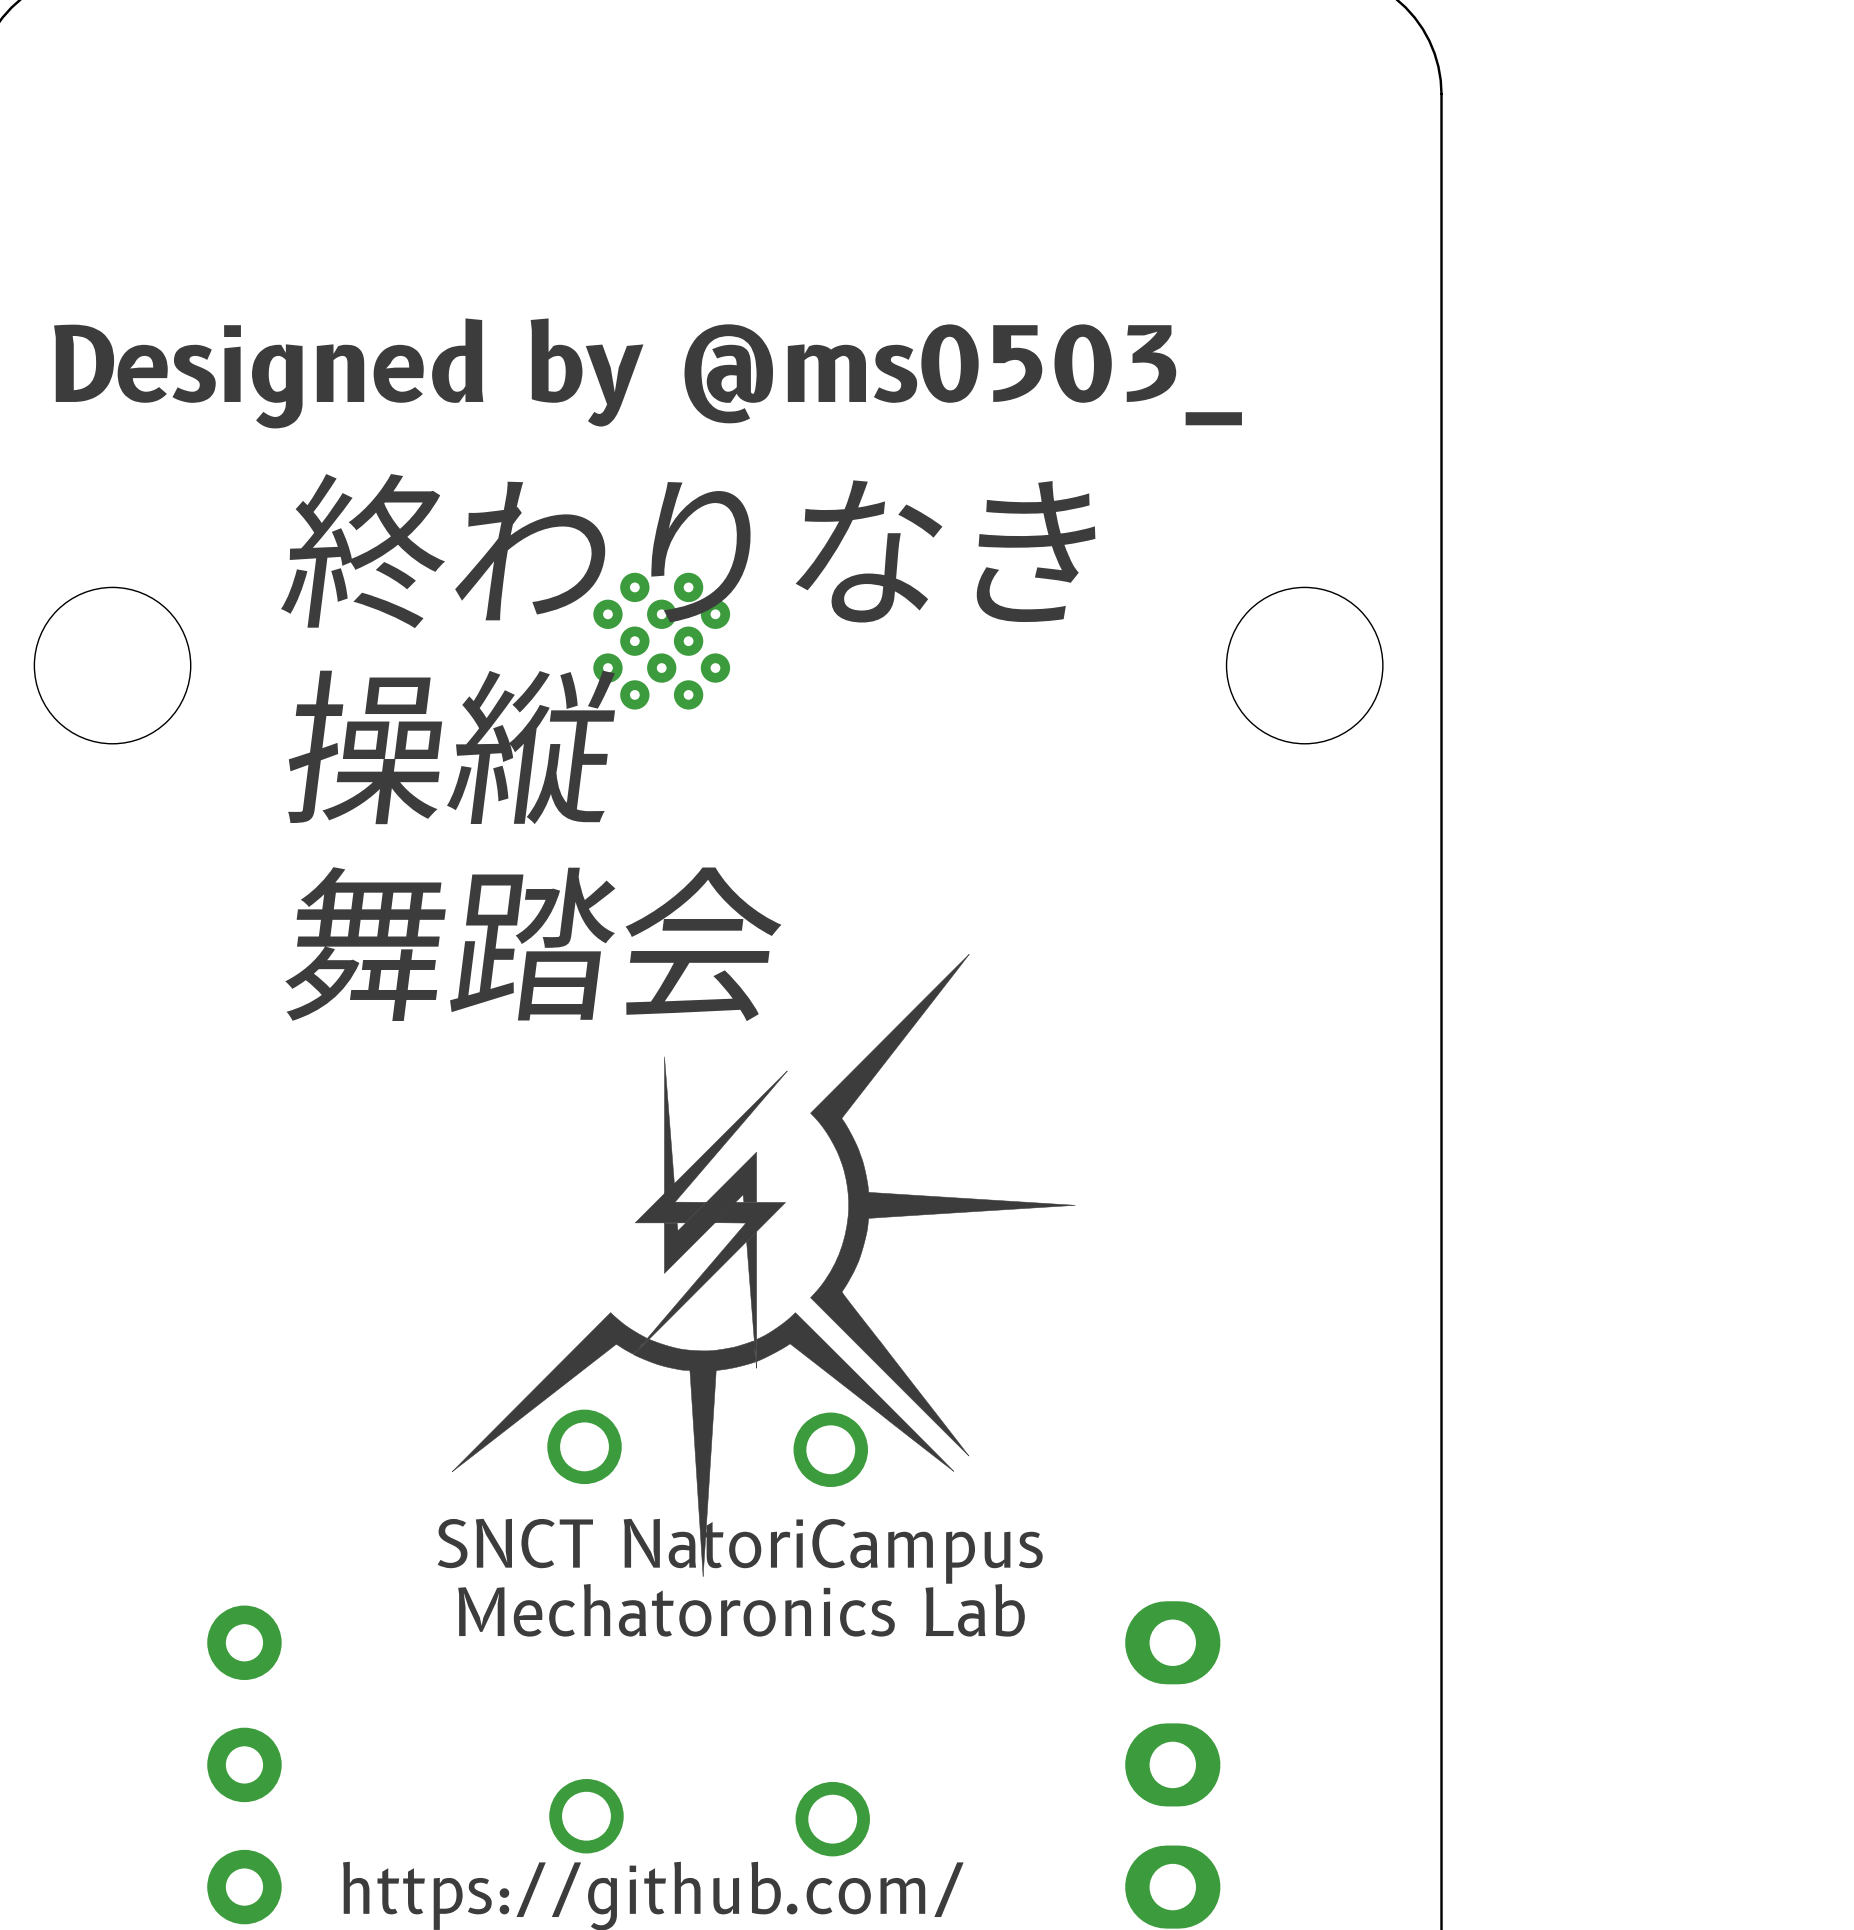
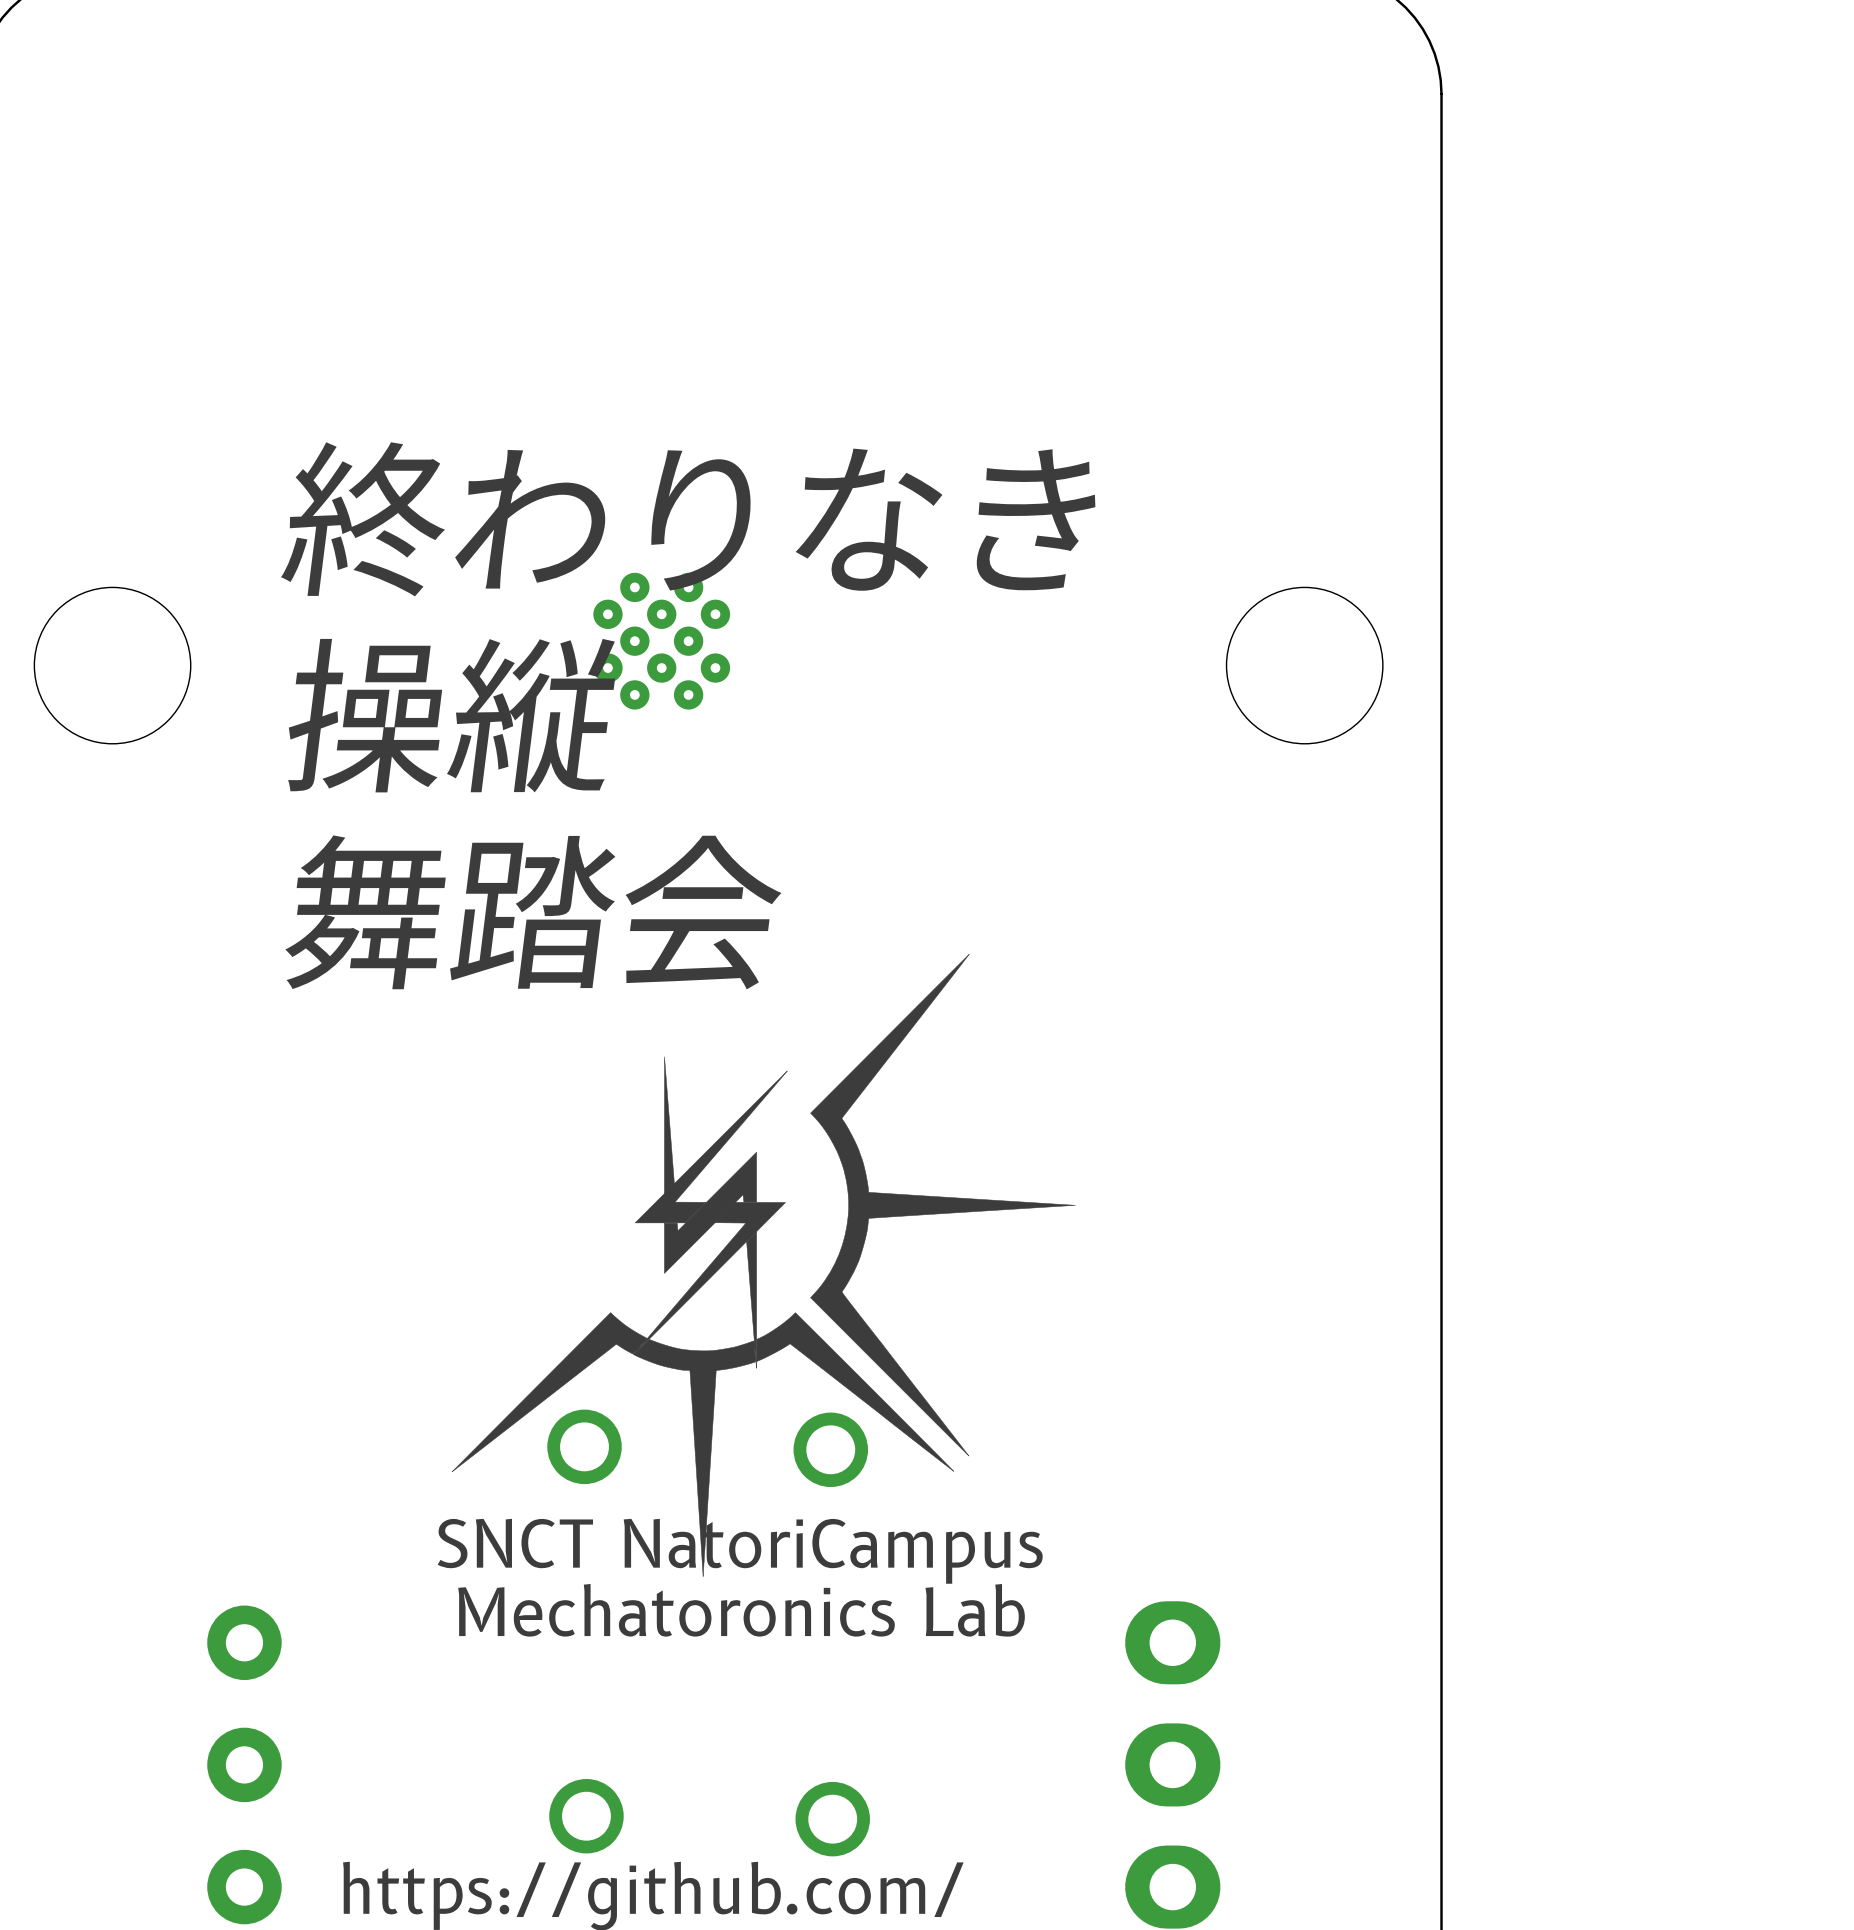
text: Designed by @ms0503_ (648, 373) -> none
text position: 終わりなき (688, 551) -> 終わりなき (688, 519)
text position: 操縦 (451, 747) -> 操縦 (451, 715)
text position: 舞踏会 (533, 944) -> 舞踏会 (533, 912)

